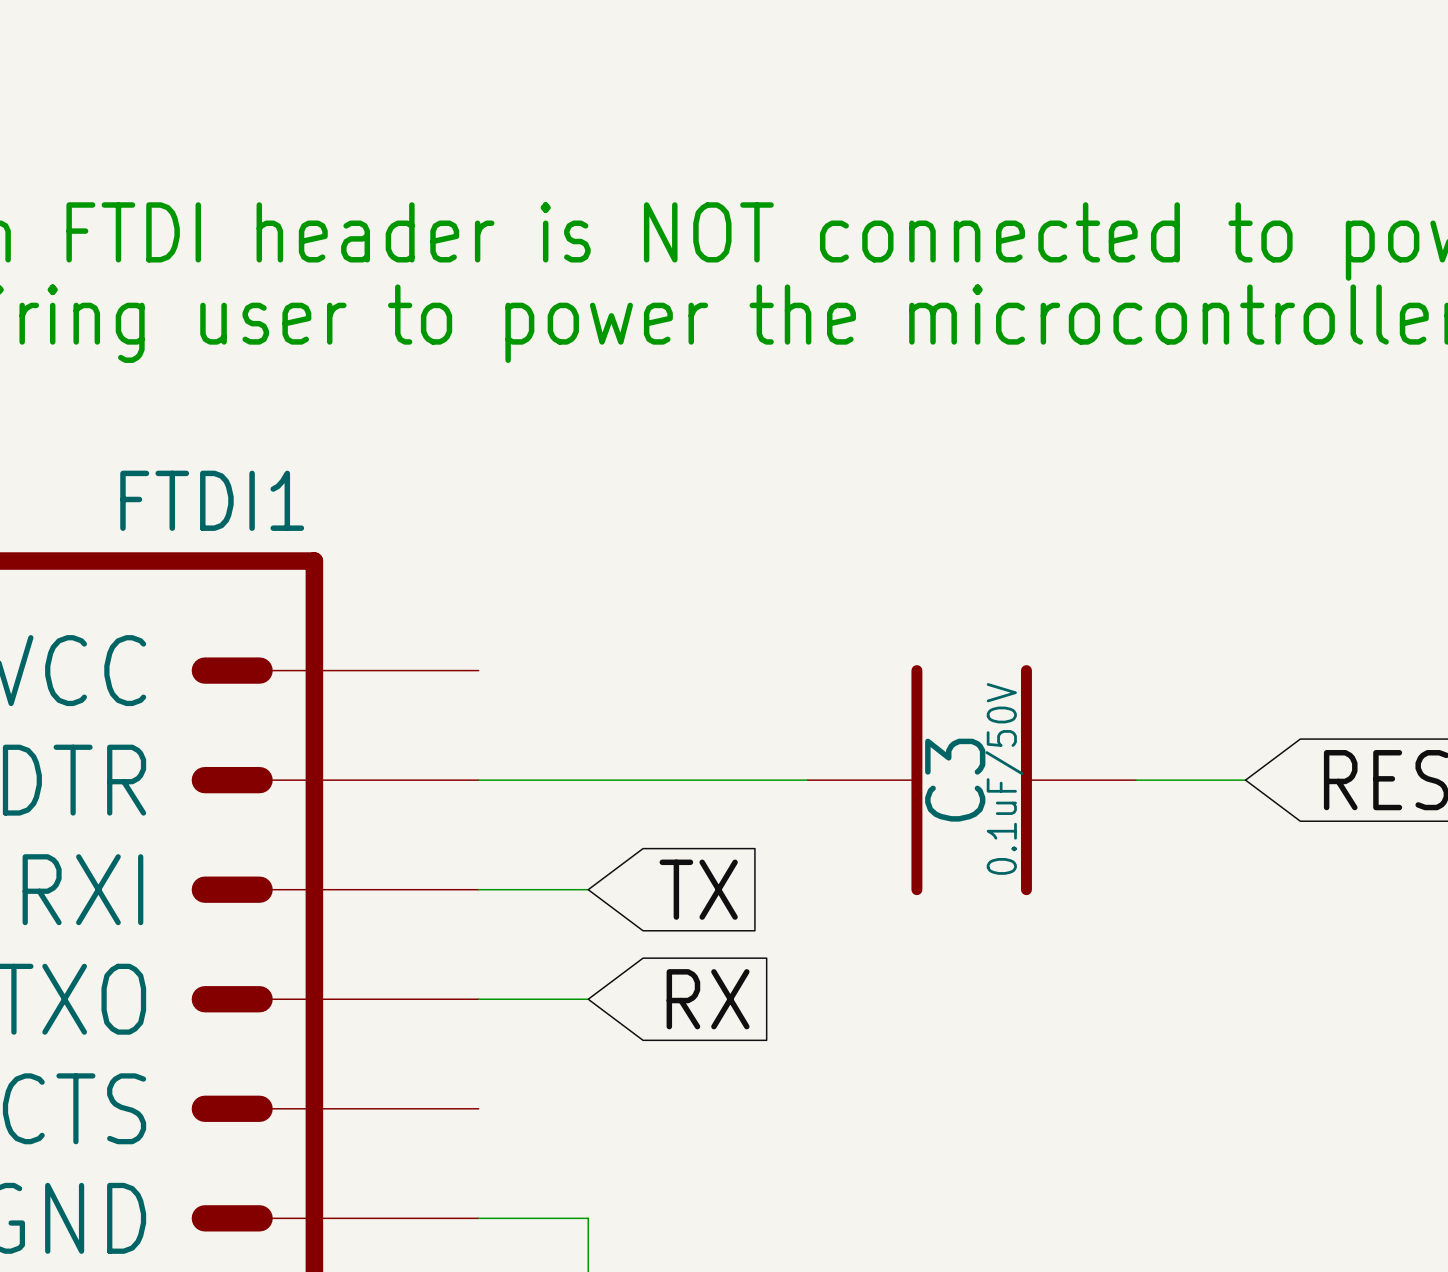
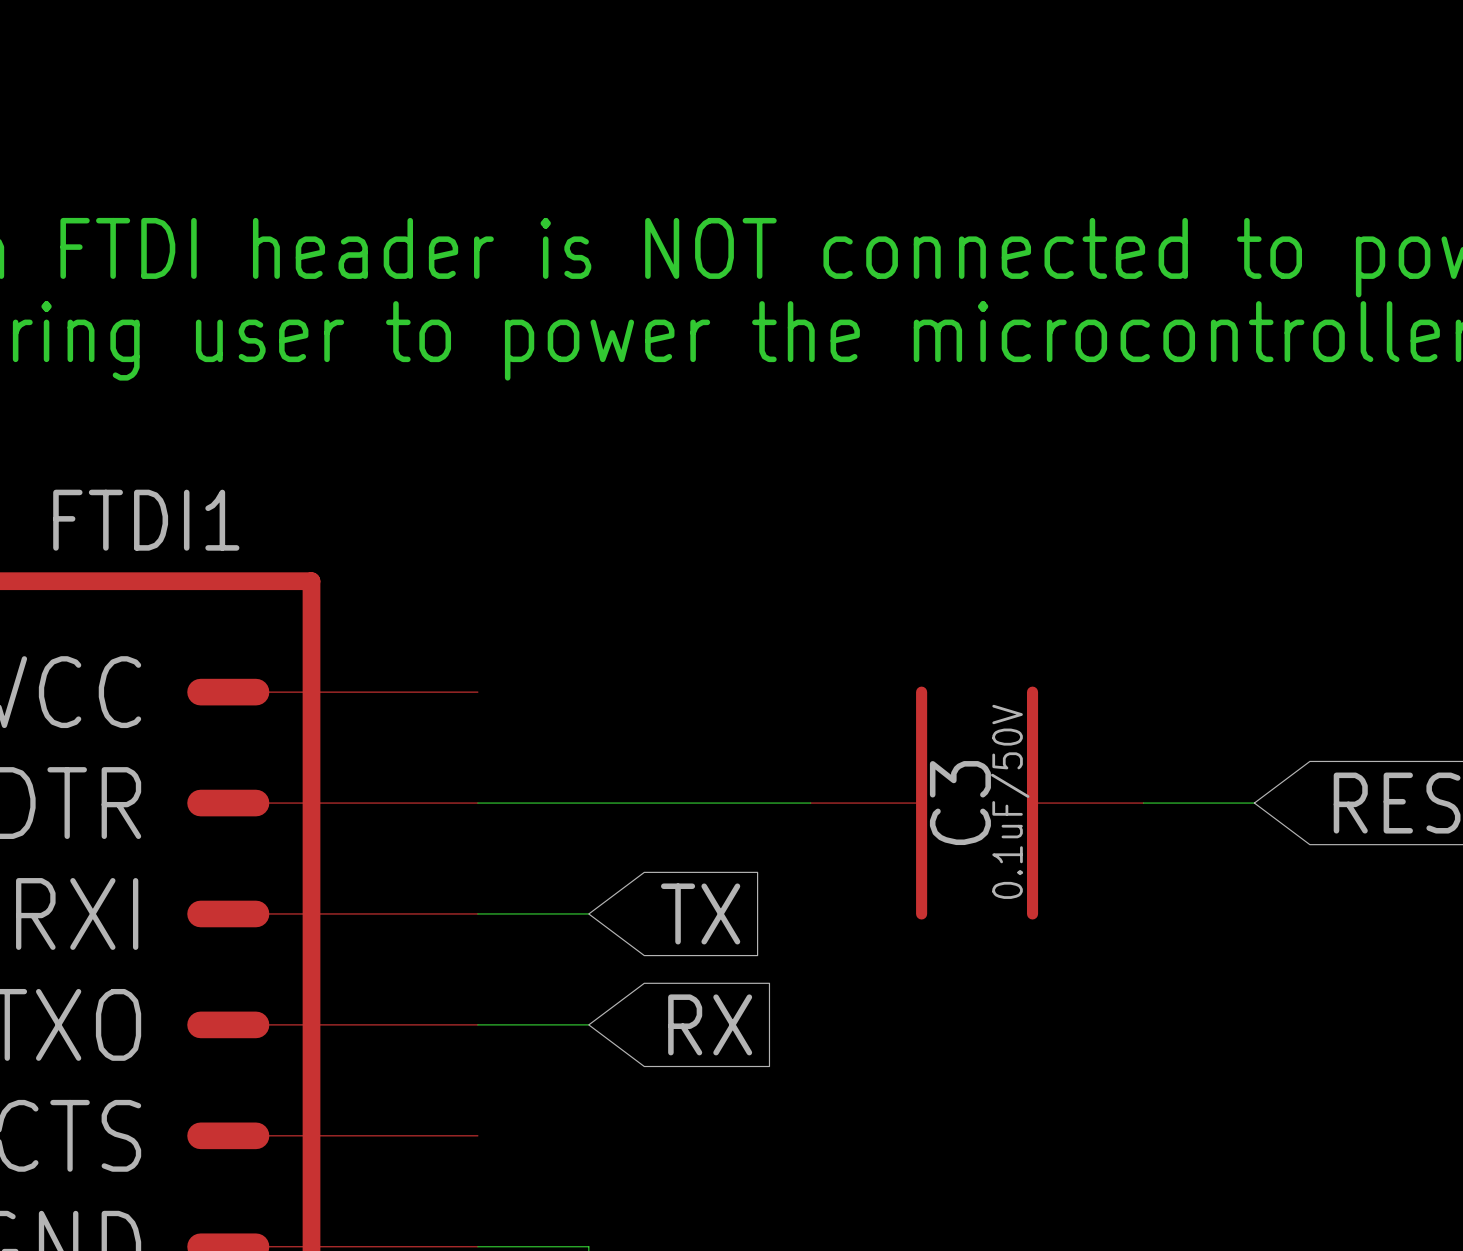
FTDI1 name position: FTDI1 (212, 500) -> FTDI1 (146, 520)

